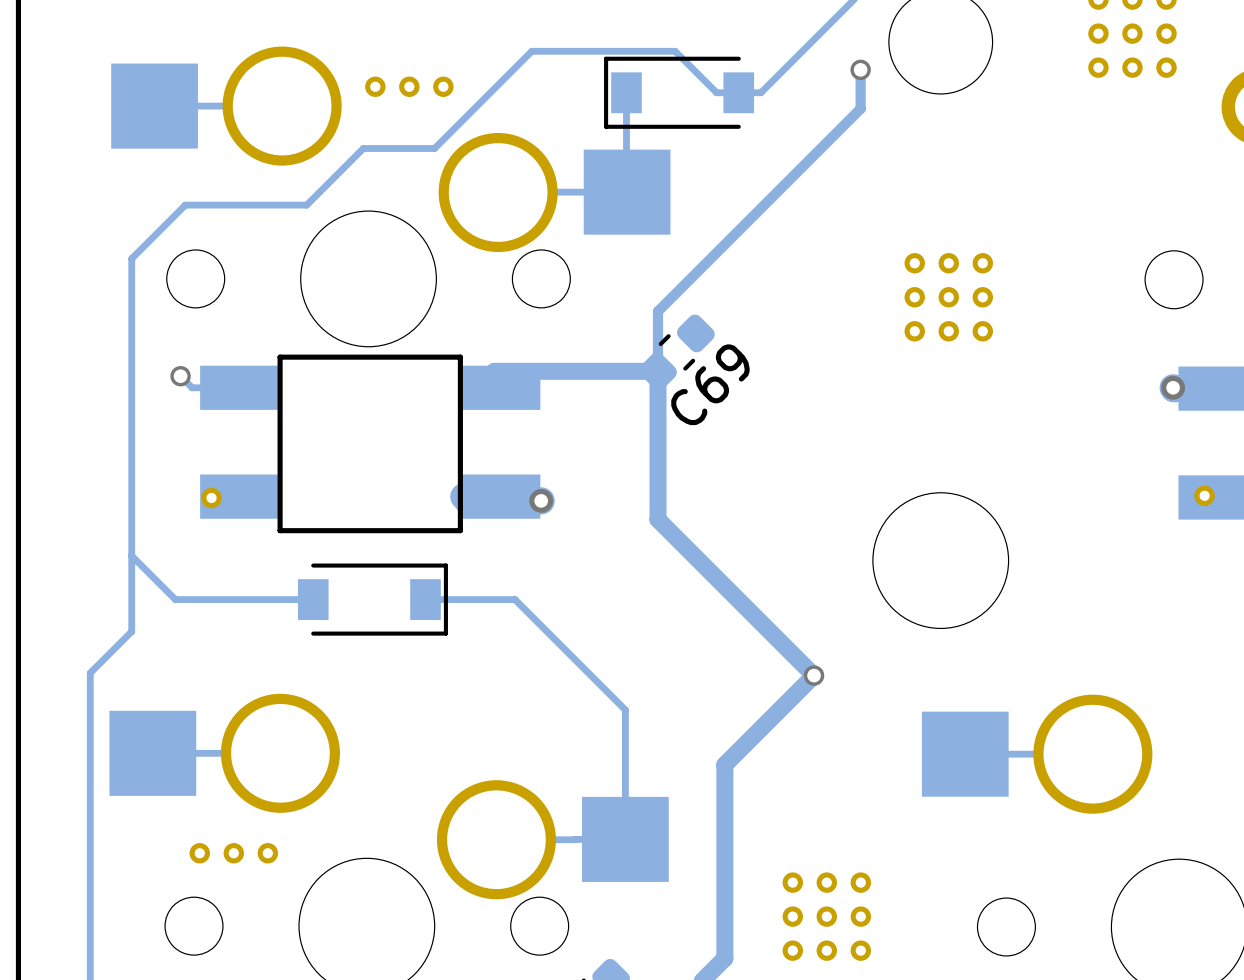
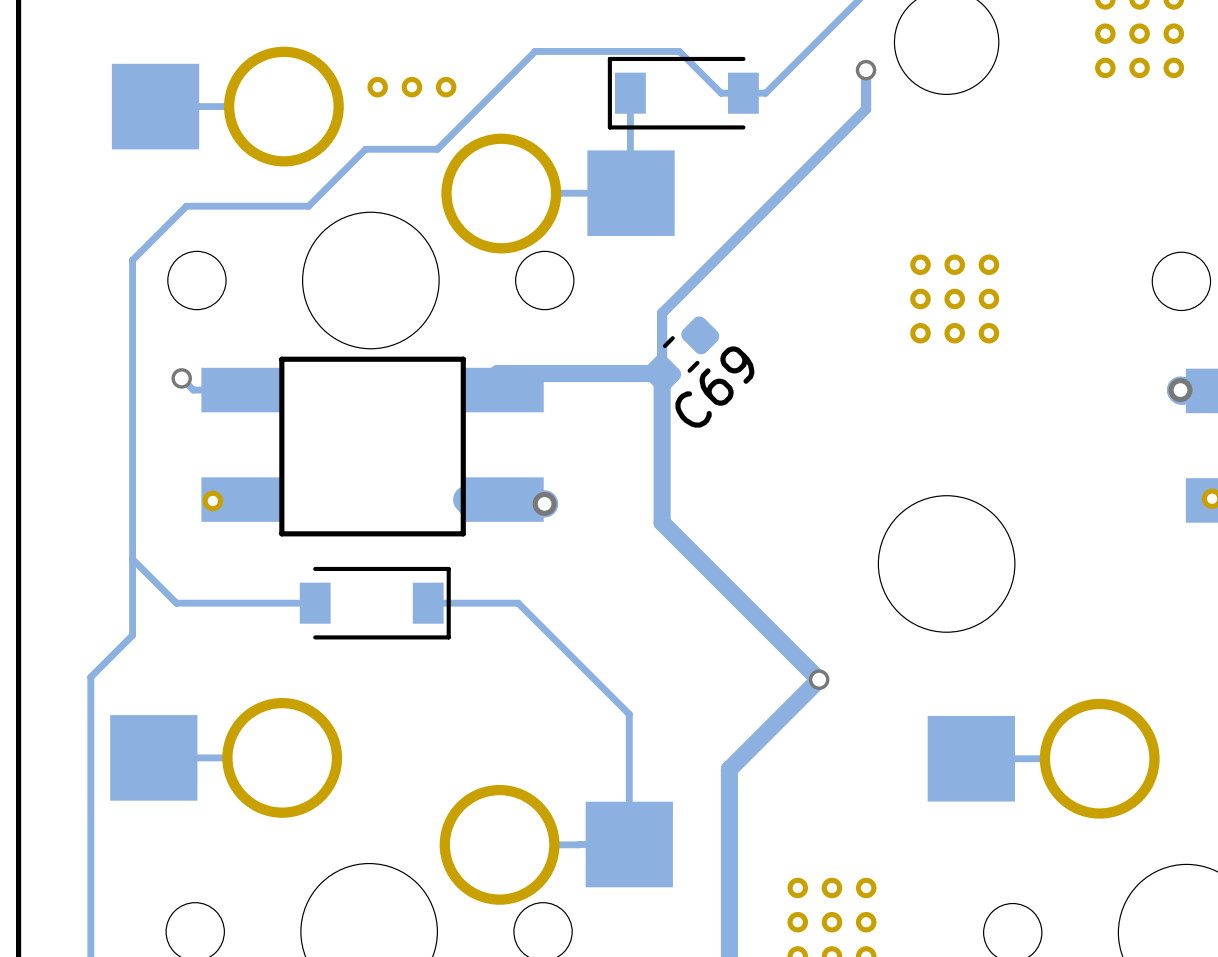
part: (199, 853) -> none
part: (233, 853) -> none
part: (267, 853) -> none

